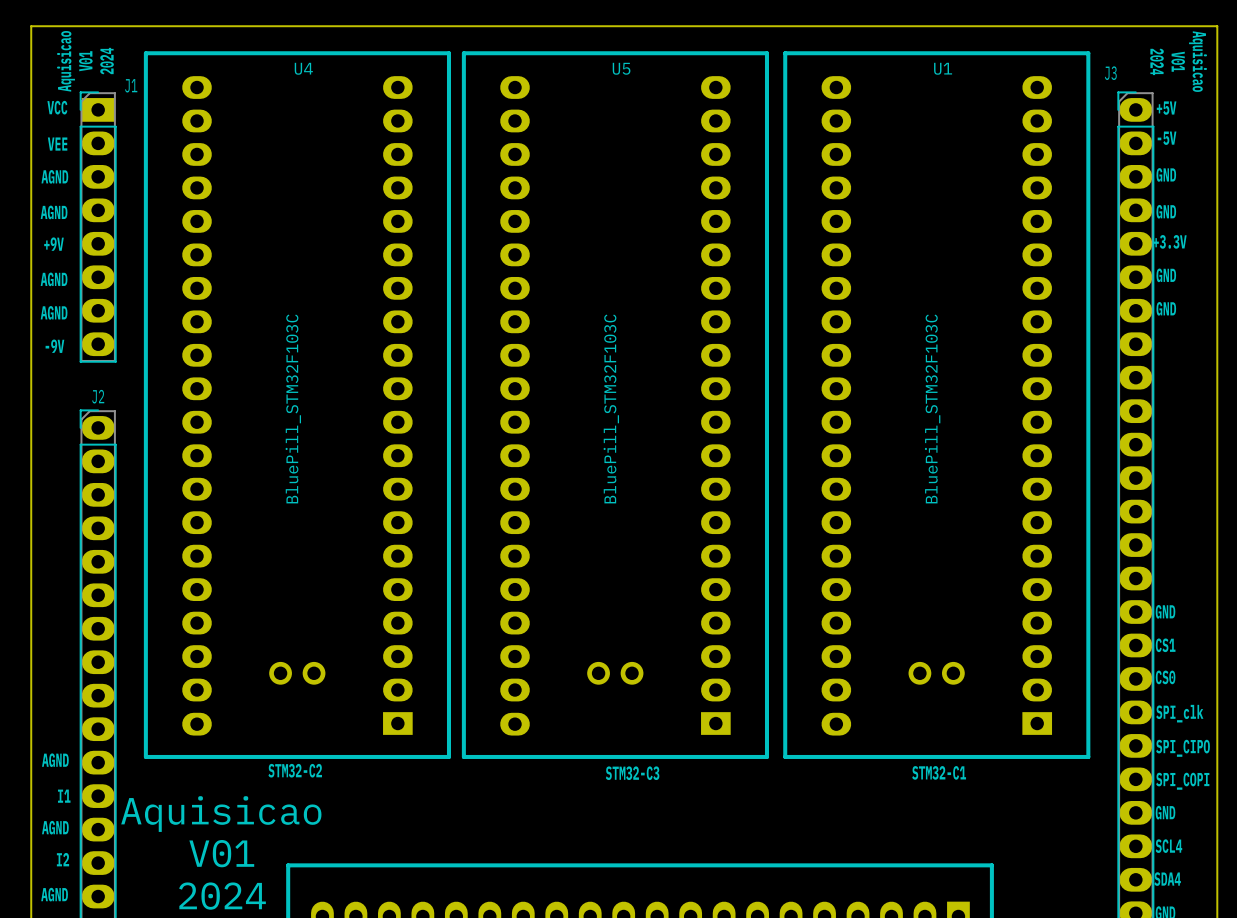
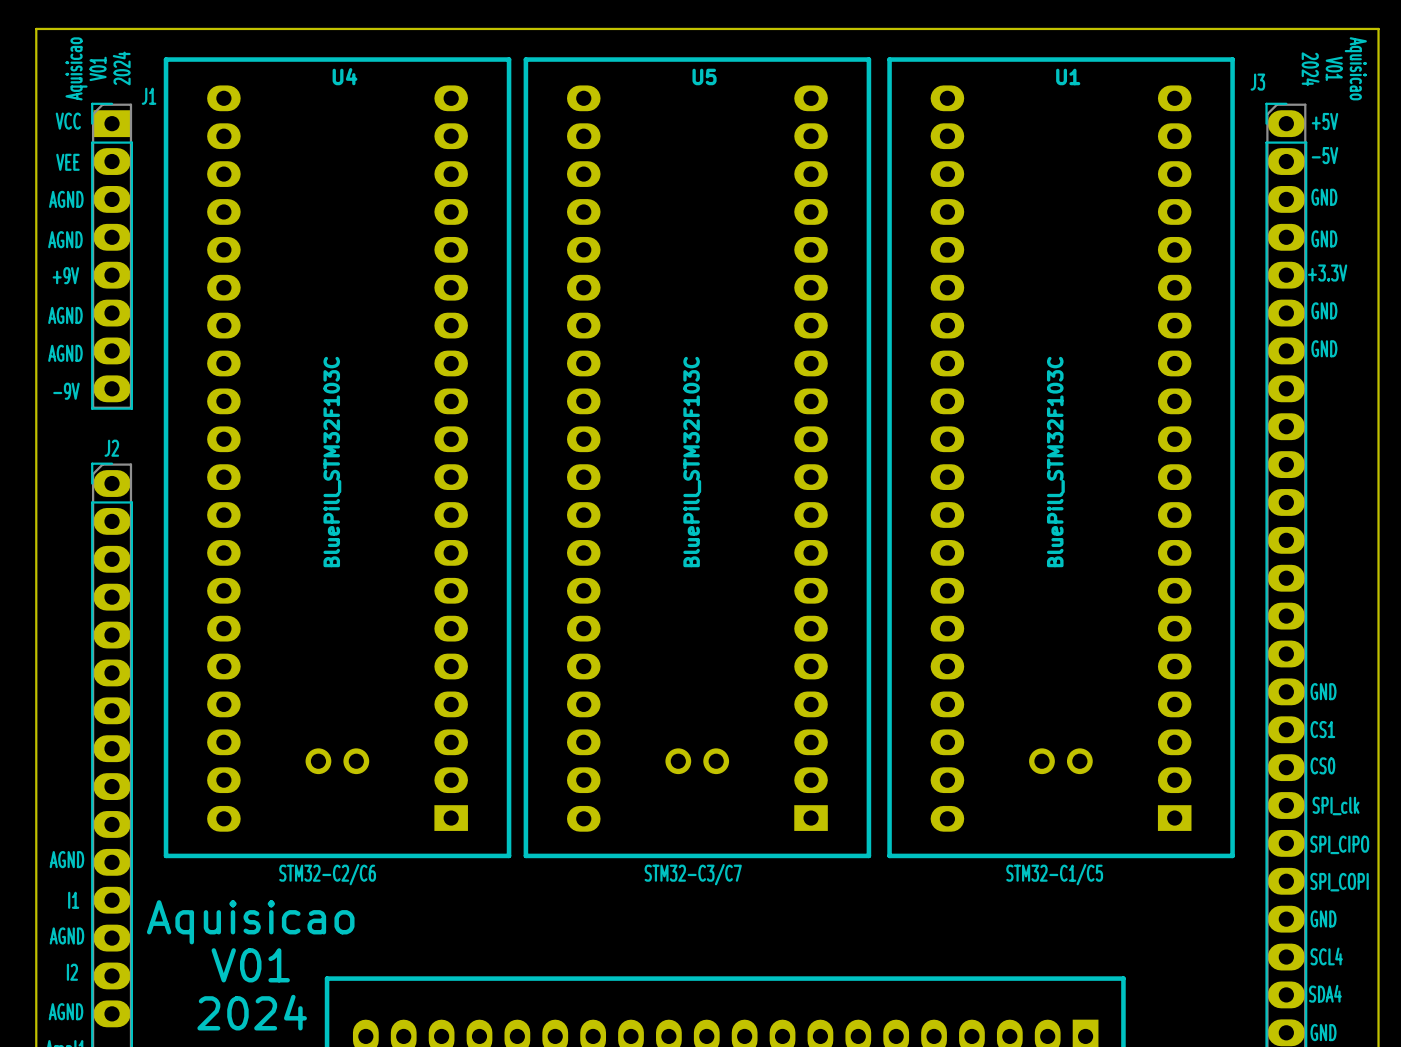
text: STM32-C2 (295, 770) -> STM32-C2/C6 (327, 874)
text: STM32-C1 (939, 772) -> STM32-C1/C5 (1054, 874)
text: STM32-C3 (632, 773) -> STM32-C3/C7 (693, 874)

